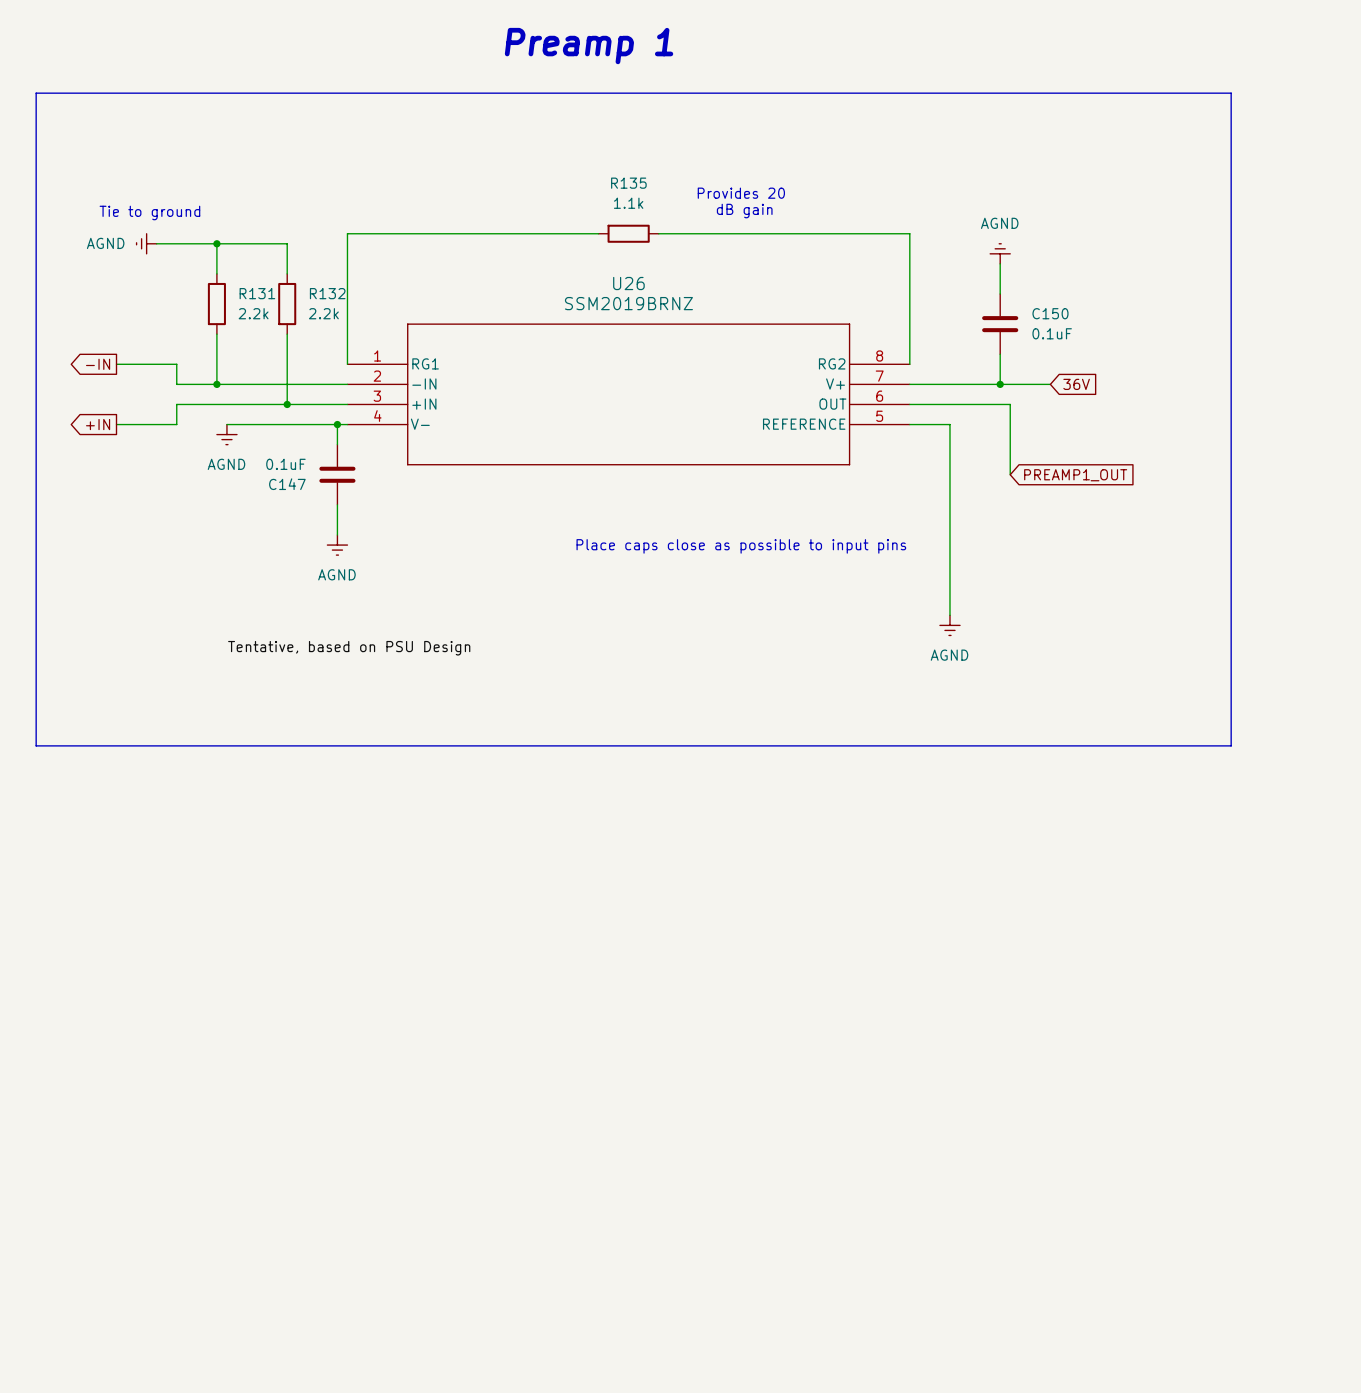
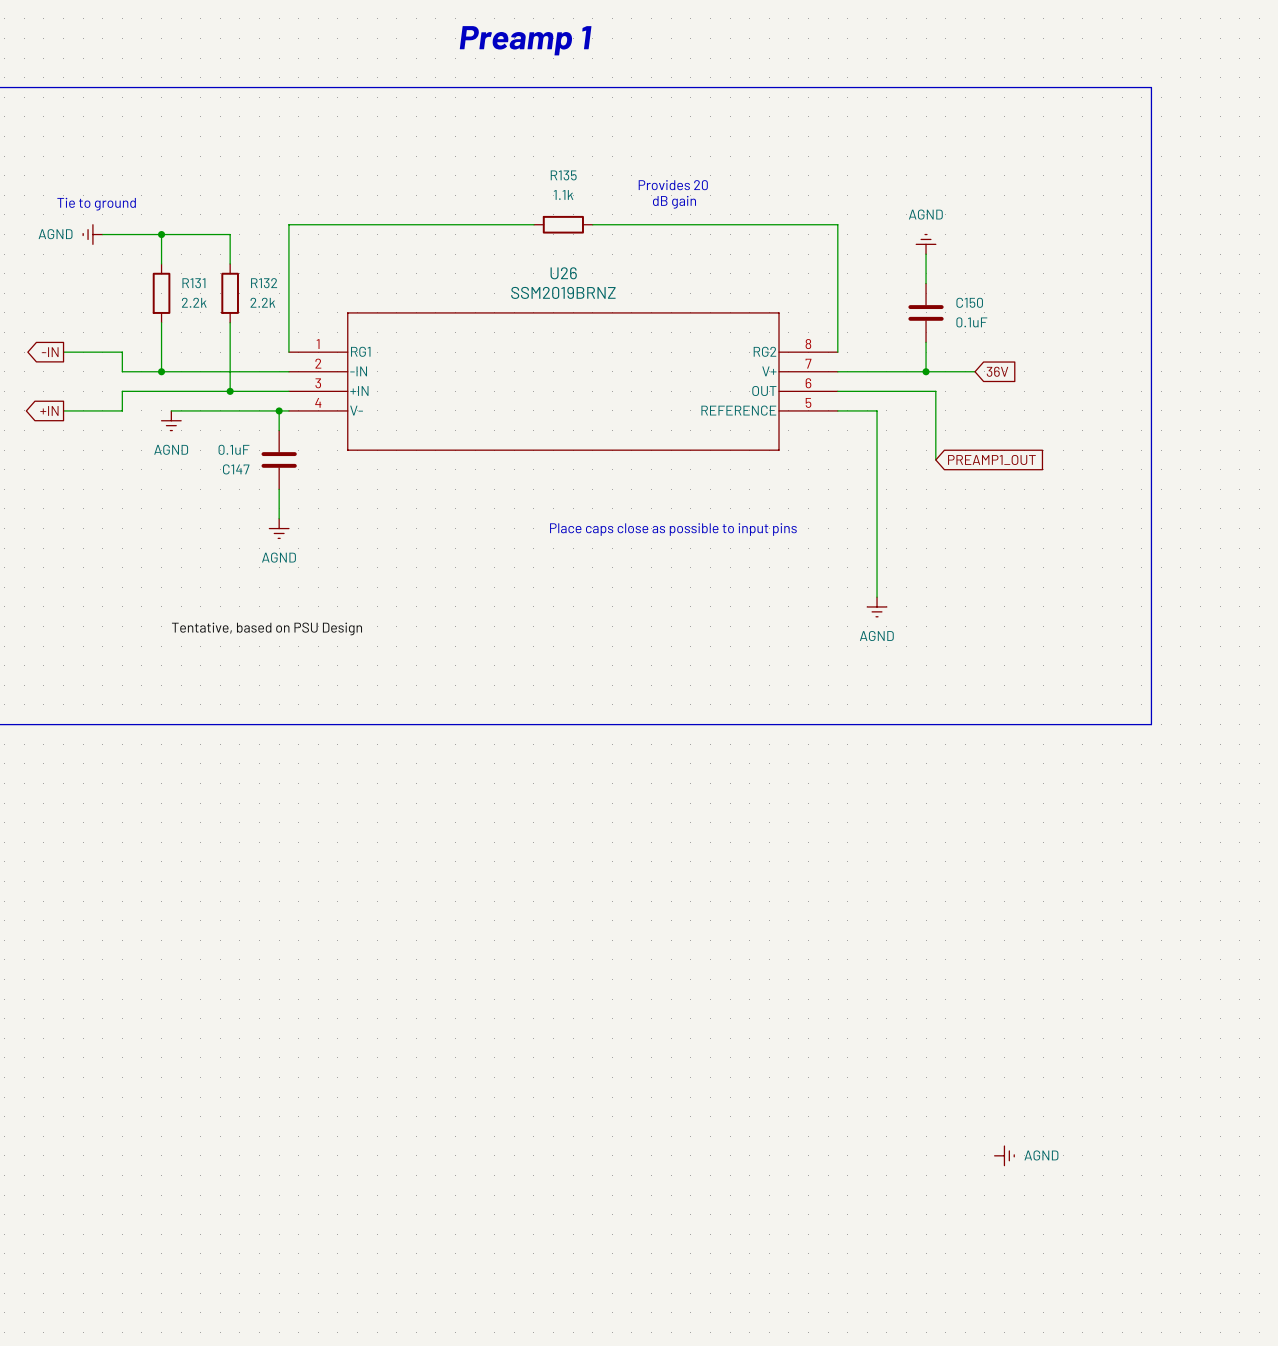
power symbol: none -> AGND (1004, 1155)

